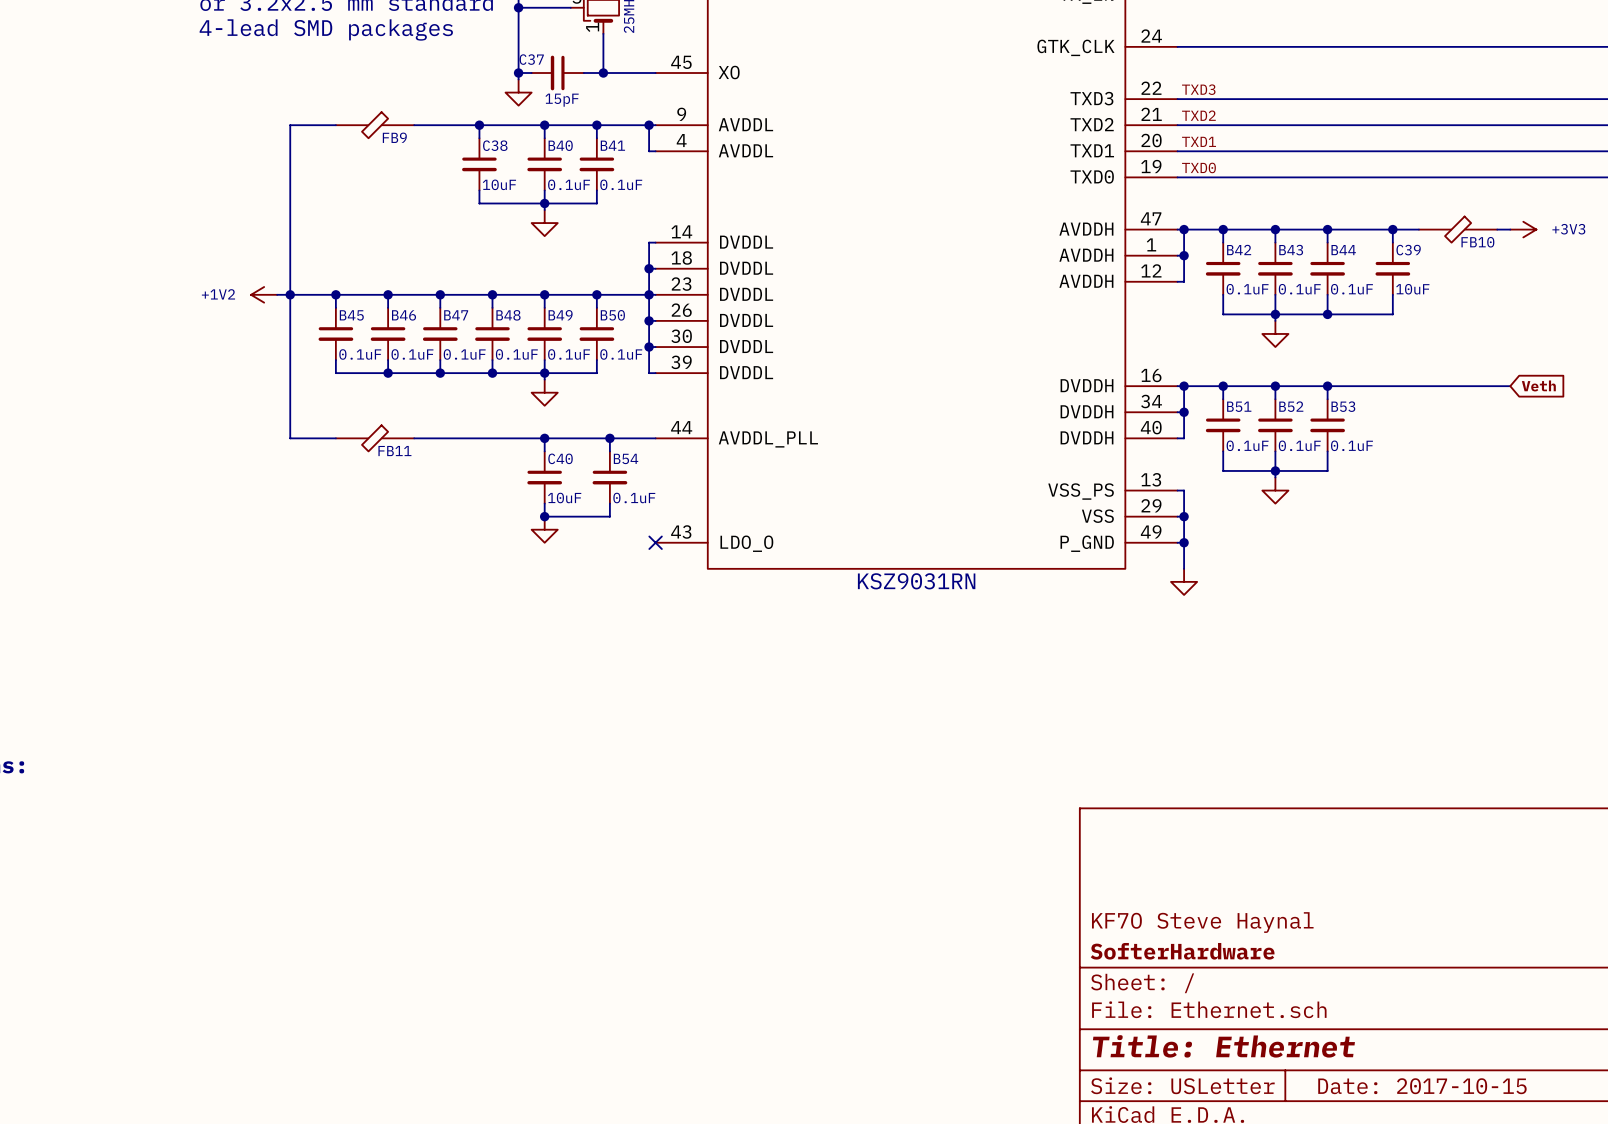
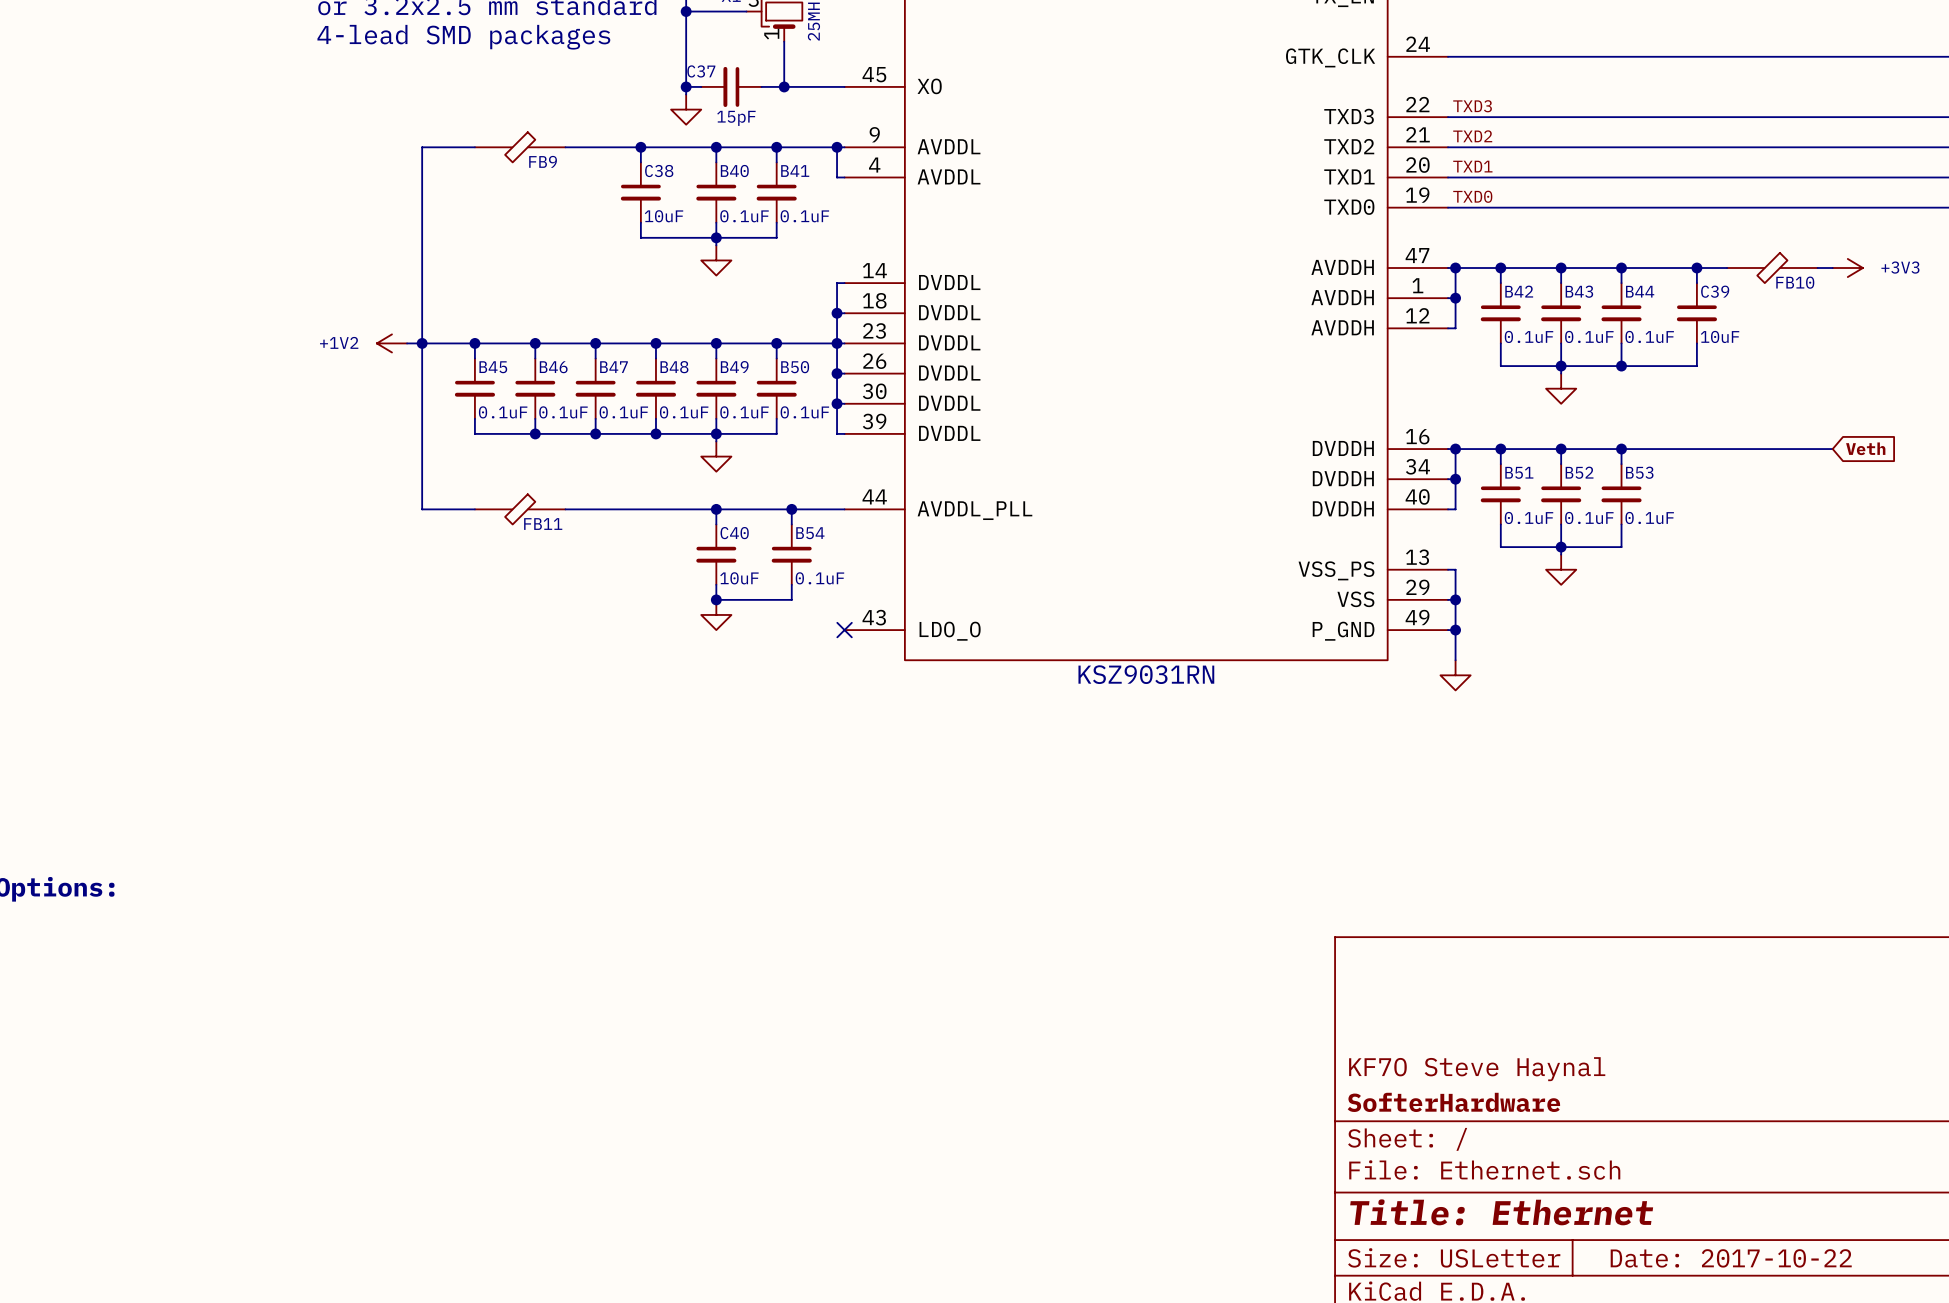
title block: Date: 2017-10-15 (1422, 1086) -> Date: 2017-10-22 (1731, 1258)

